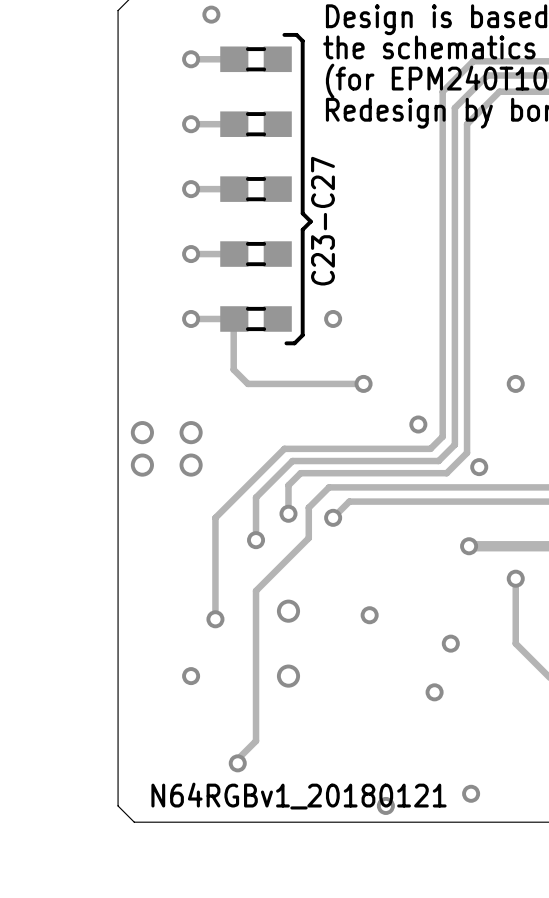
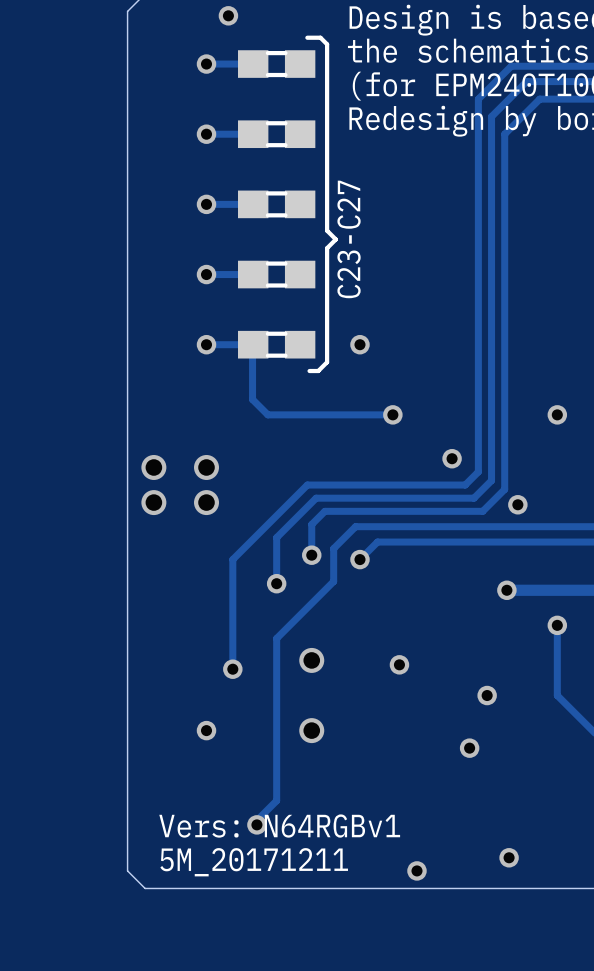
text: none -> Vers: N64RGBv1 (279, 826)
text: N64RGBv1_20180121 (298, 796) -> 5M_20171211 (254, 862)

